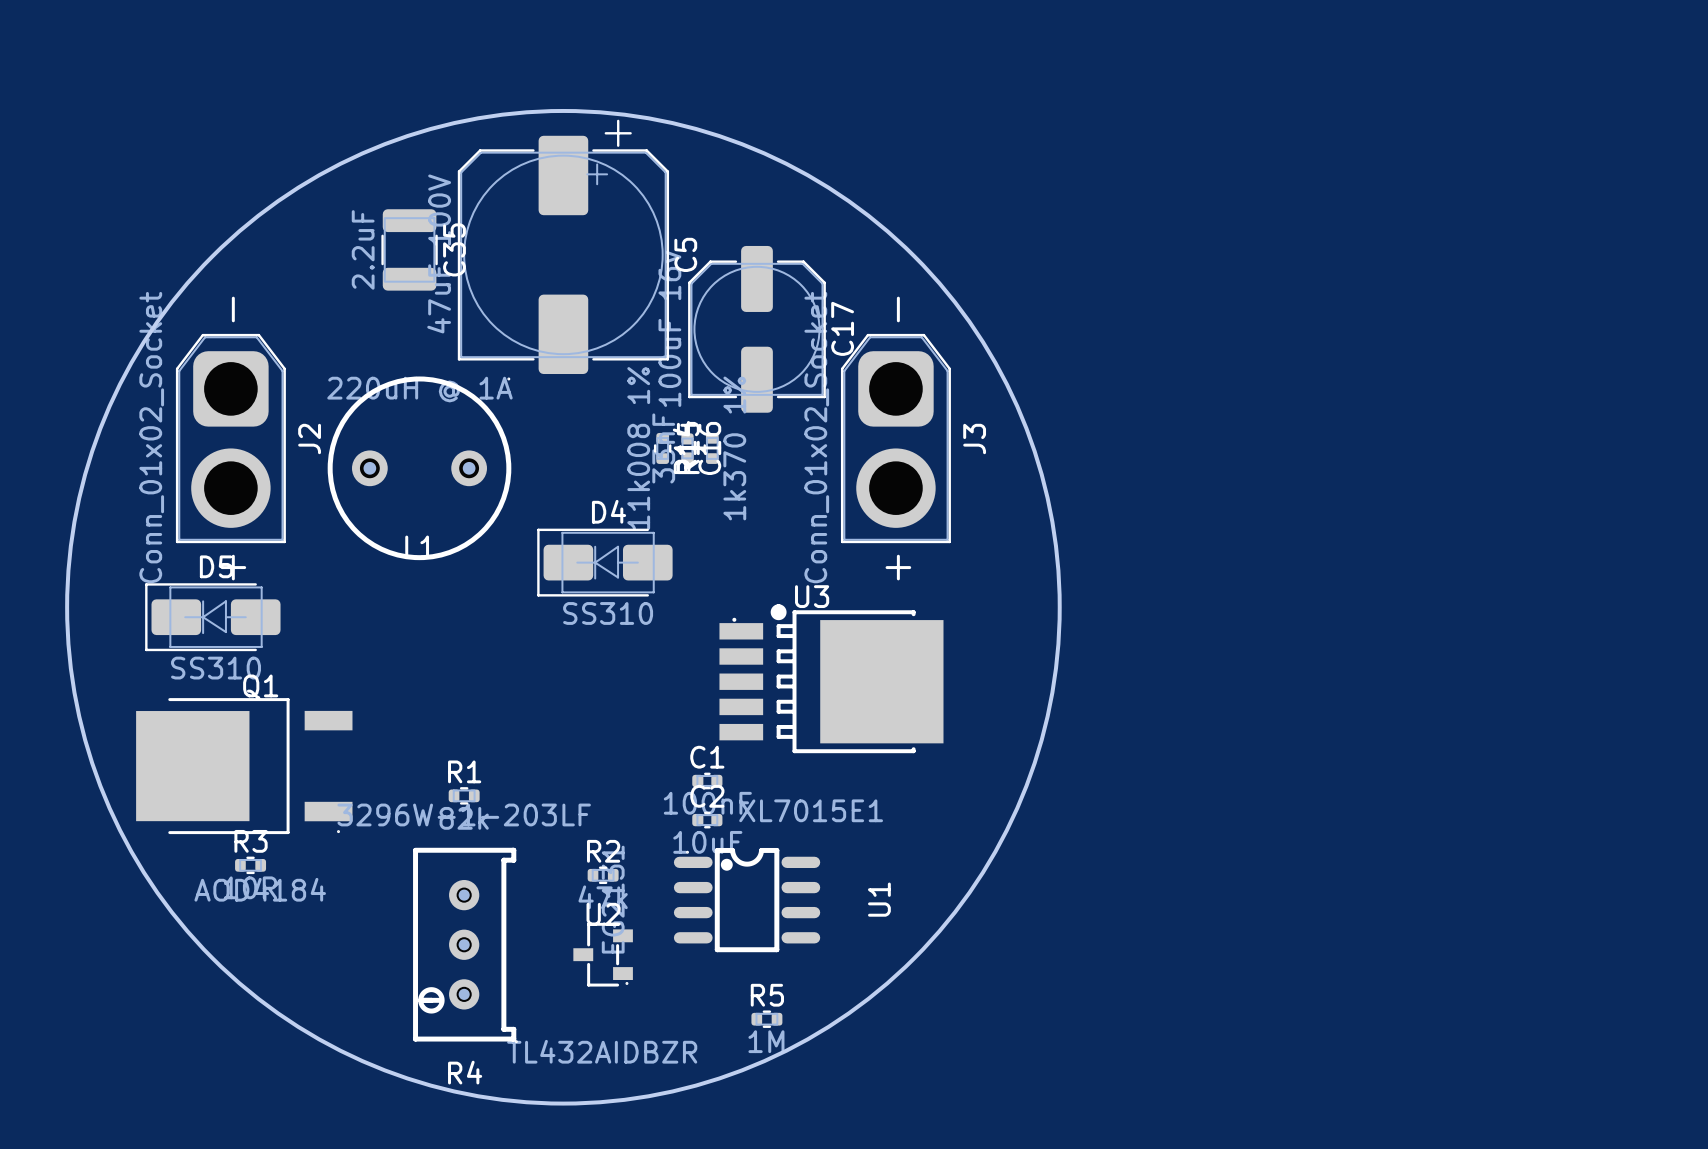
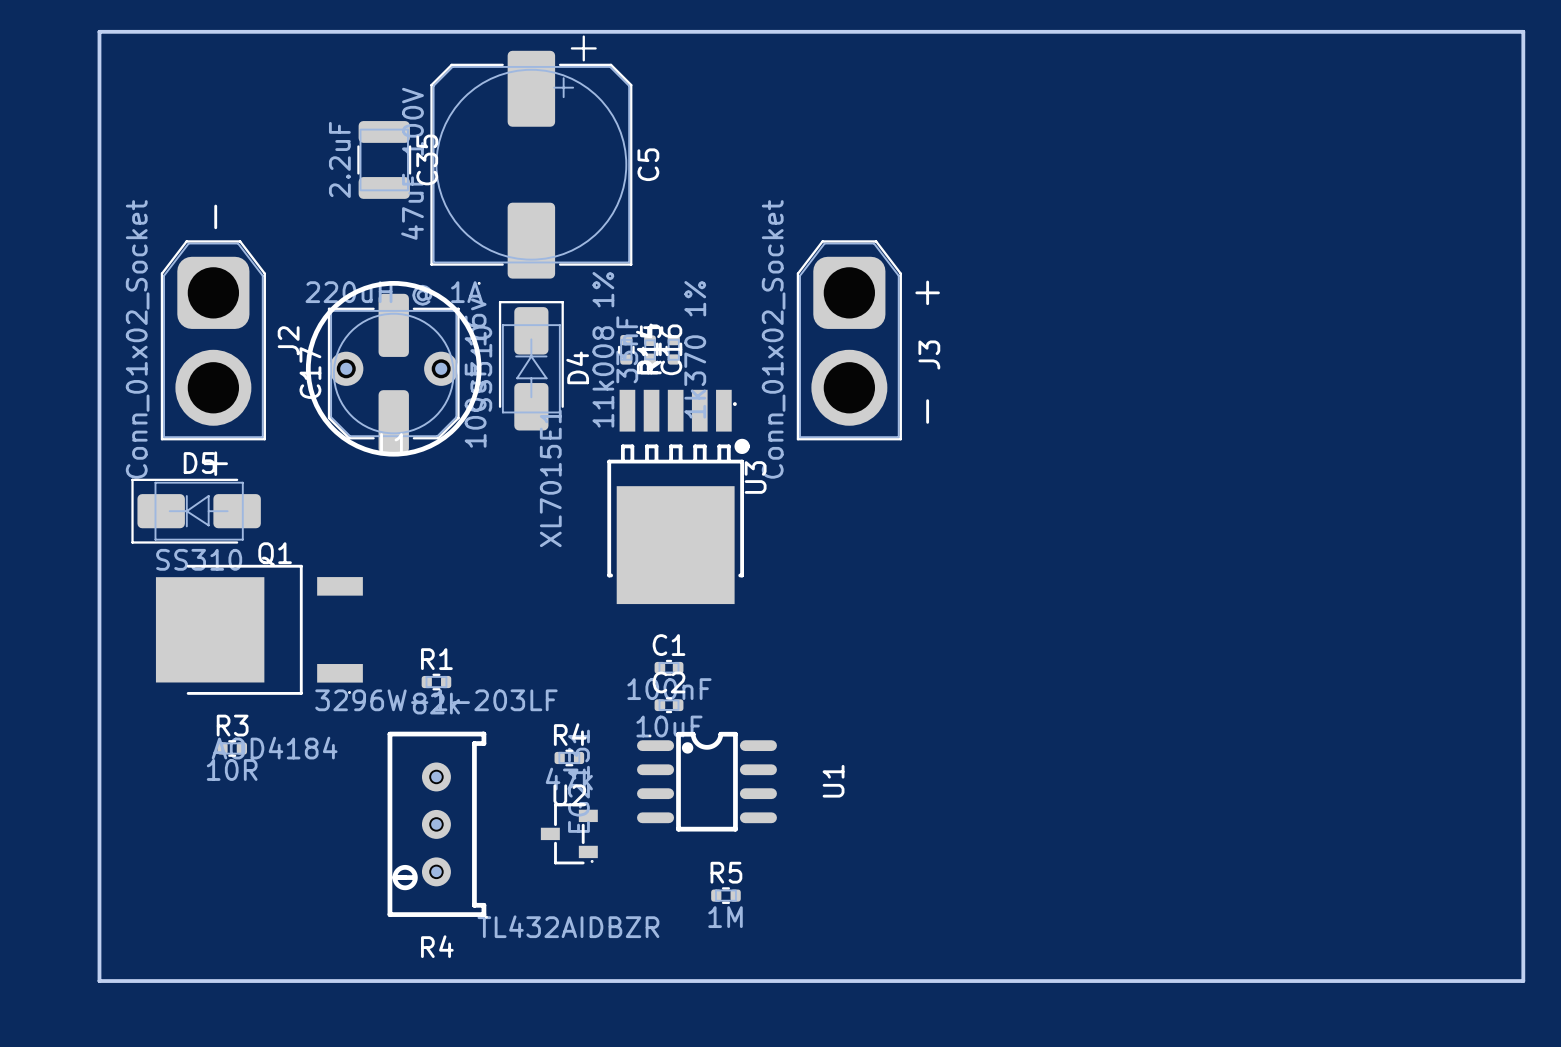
round board edge: [65, 108, 1062, 1106] -> none
board edge: none -> (99, 31) (1523, 31) (1523, 981) (99, 981) (99, 31)
J3 text position: - (898, 309) -> - (927, 411)
C17 rotation: 0° (756, 329) -> 180° (393, 373)
C17 position: (756, 329) -> (393, 373)
J3 name position: J3 (974, 439) -> J3 (929, 355)
D4 rotation: 0° (604, 562) -> 90° clockwise (531, 365)
D4 position: (604, 562) -> (531, 365)
J3 text position: + (898, 567) -> + (927, 292)
U3 rotation: 0° (831, 678) -> 90° clockwise (678, 496)
U3 position: (831, 678) -> (678, 496)
Q1 position: (244, 766) -> (259, 629)
R2 name: R2 (603, 851) -> R4 (570, 734)

